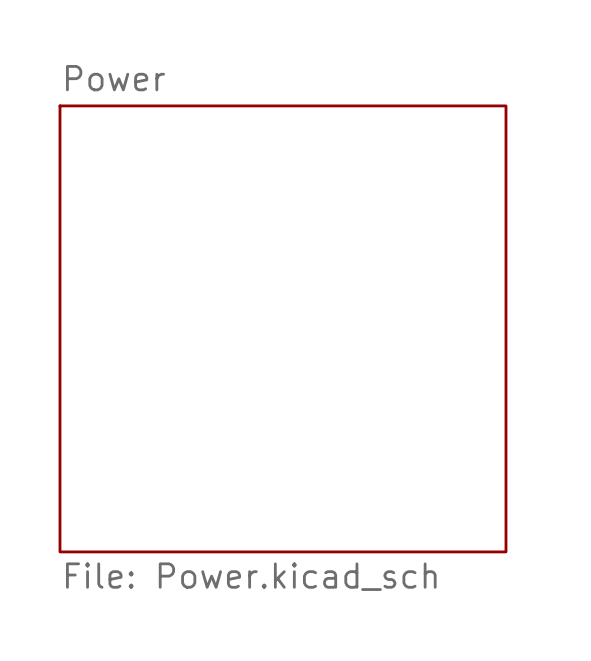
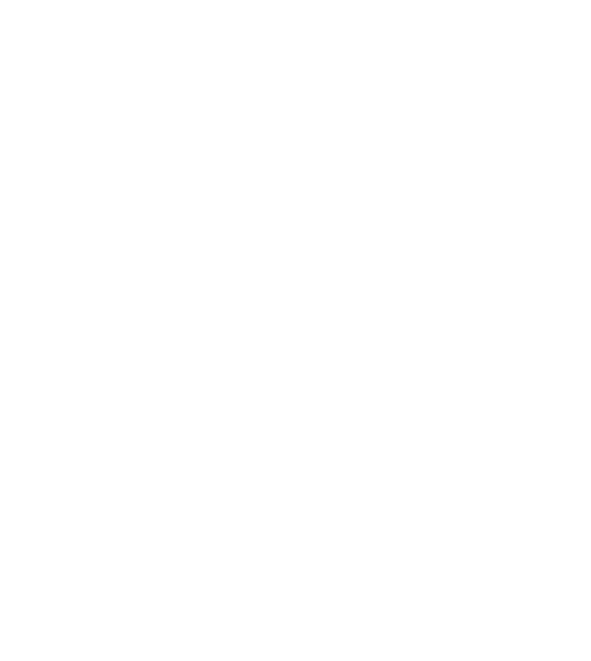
sheet Power: File: Power.kicad_sch (282, 328) -> none

